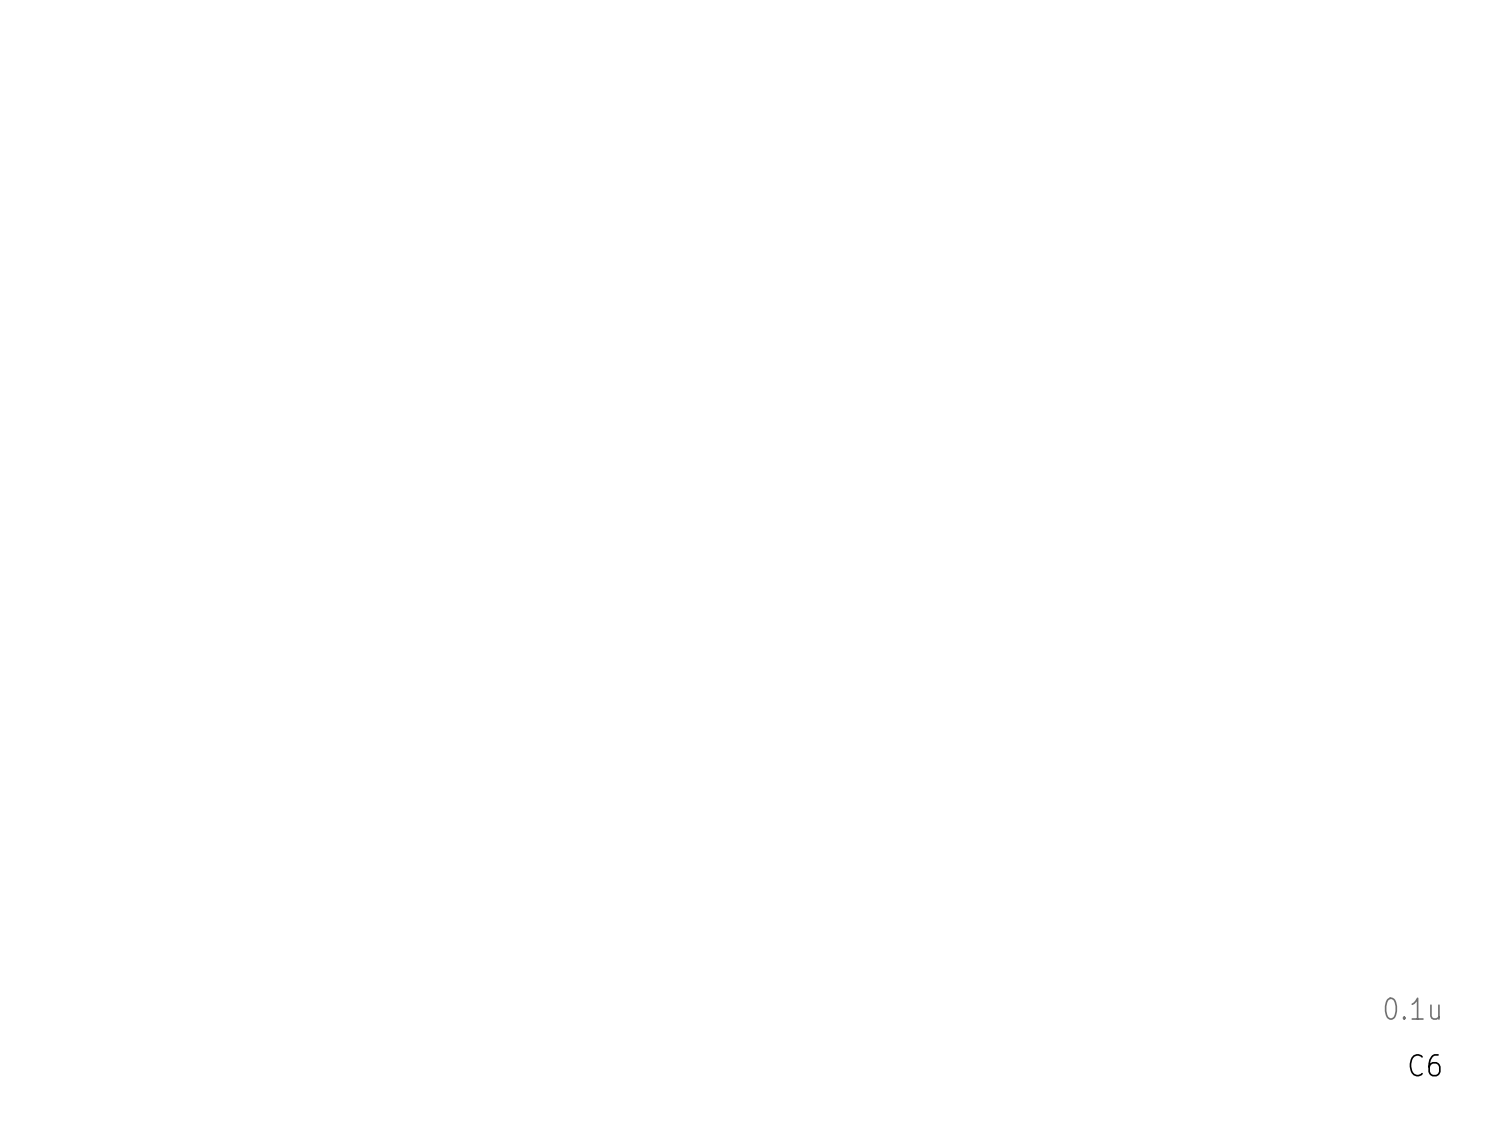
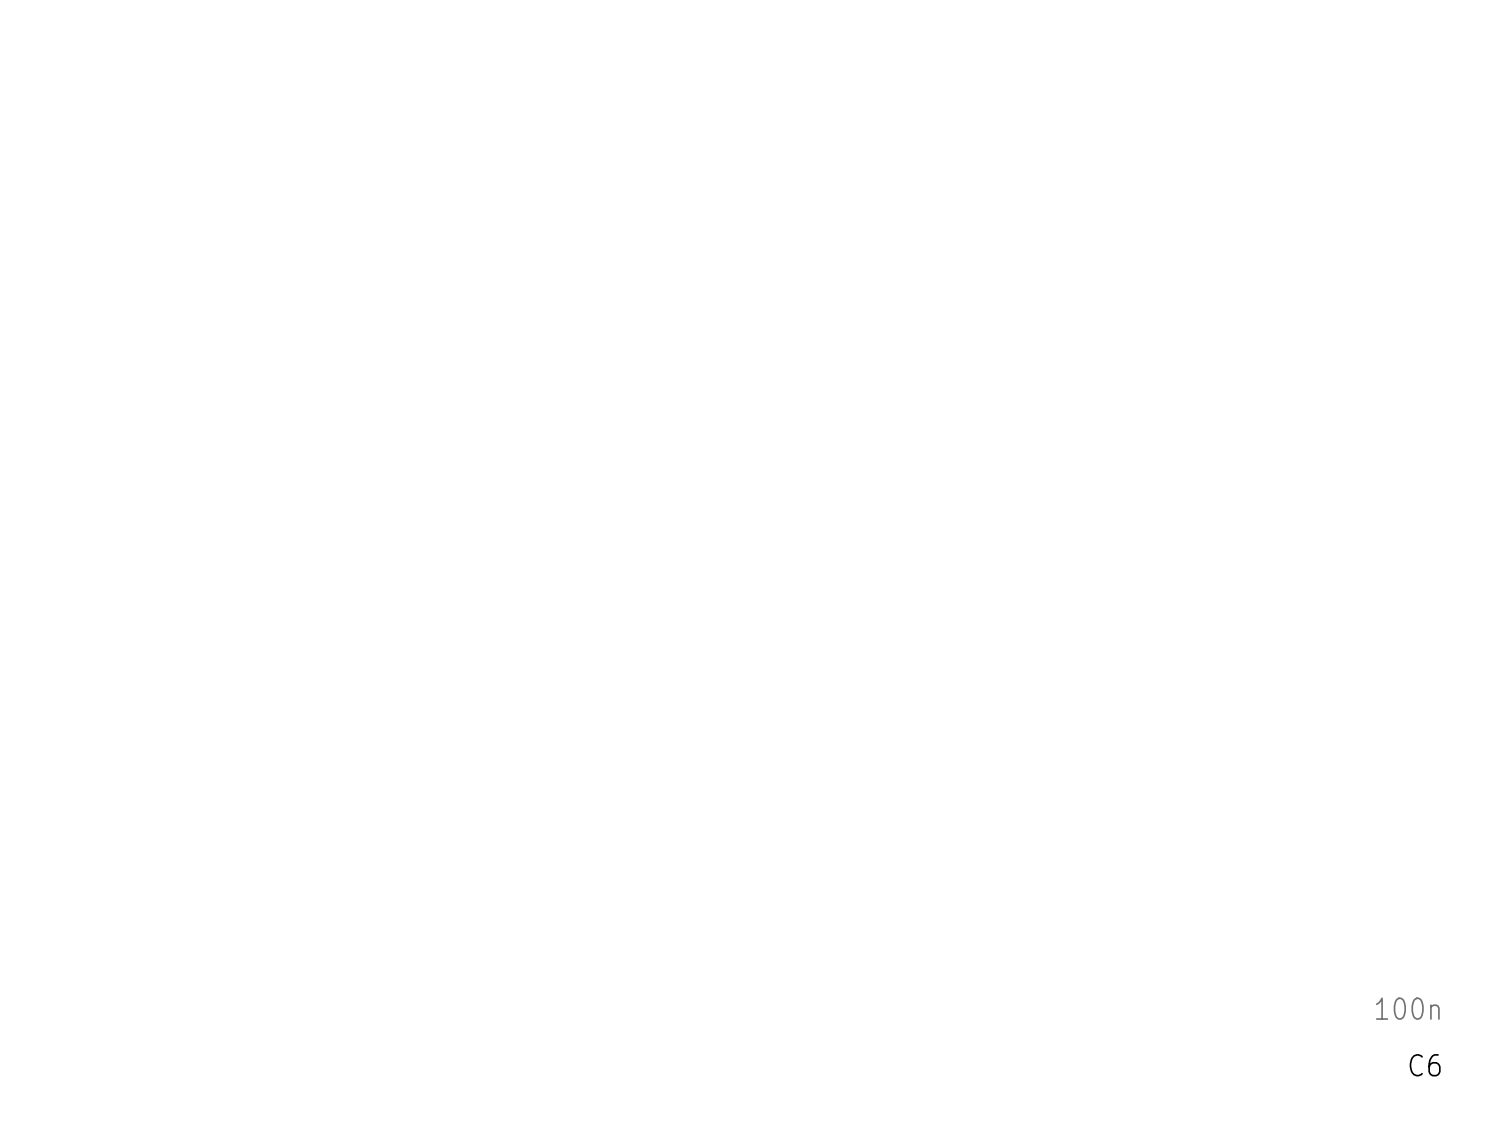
C6 value: 0.1u (1412, 1008) -> 100n (1407, 1008)

